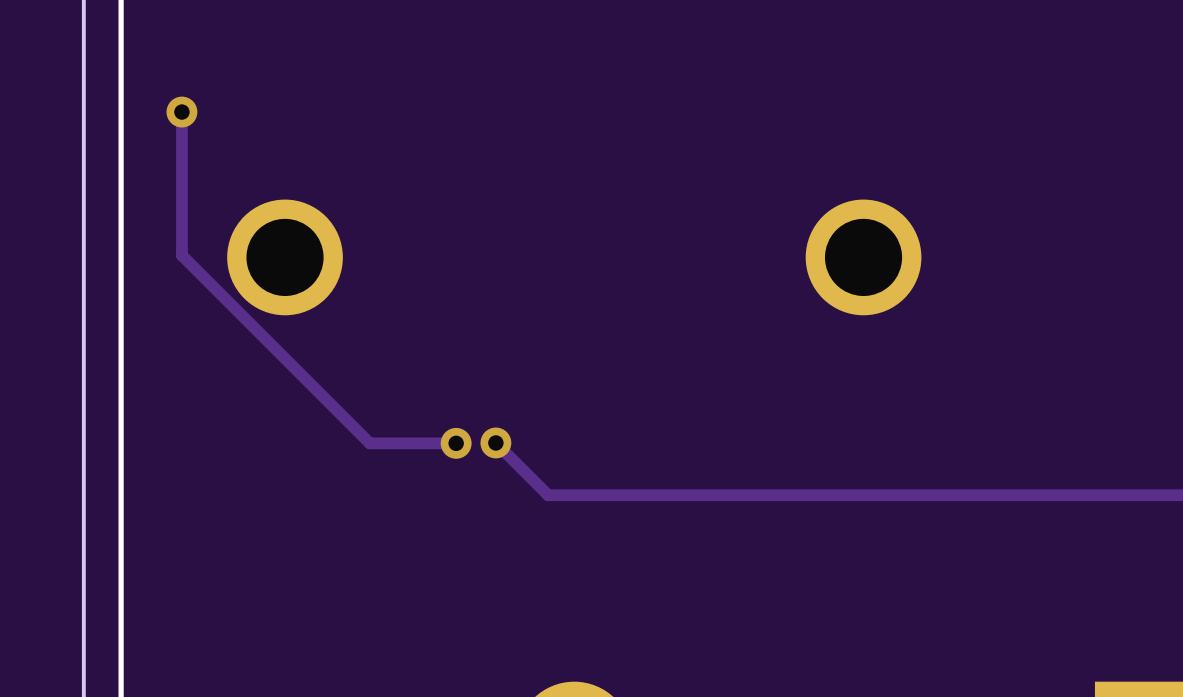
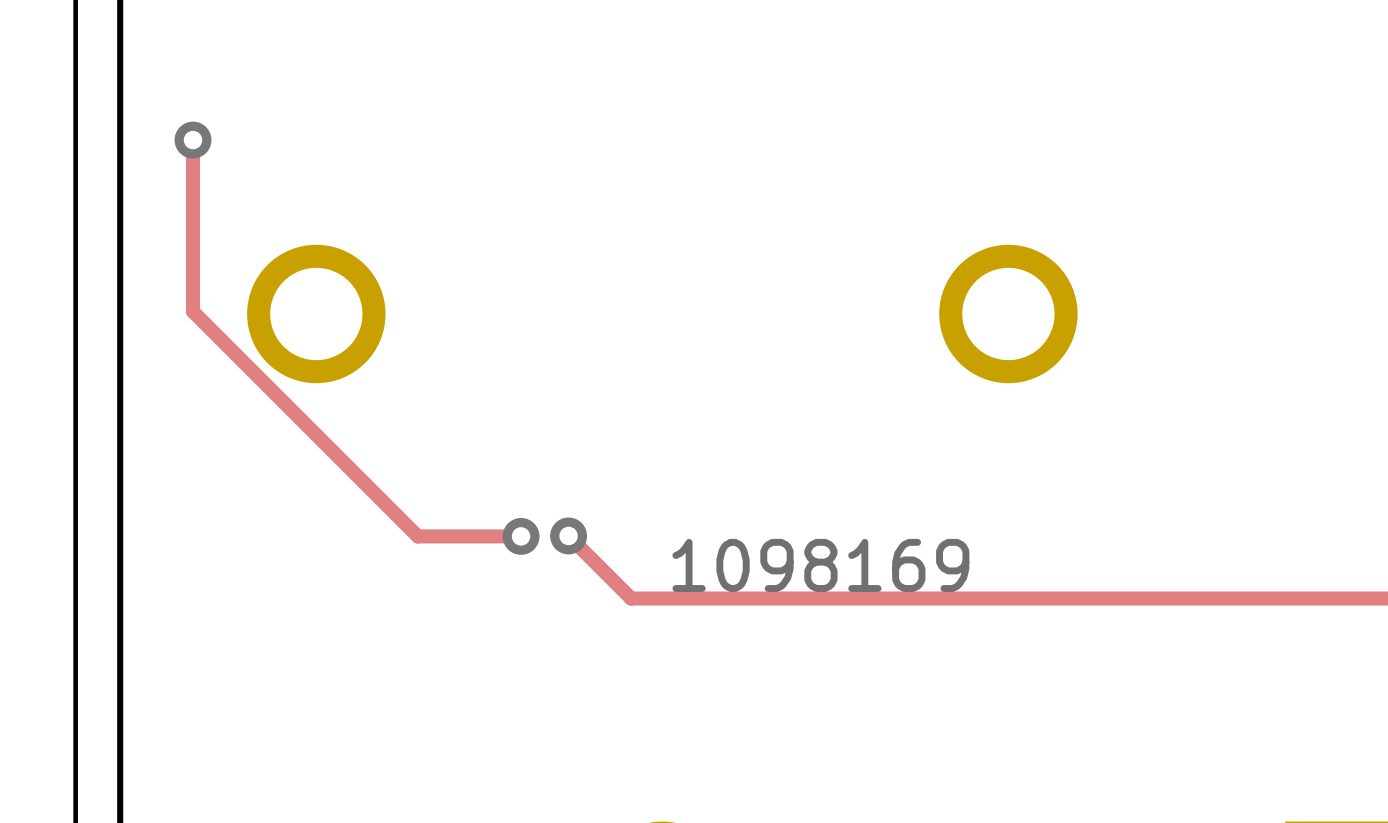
part value: none -> 1098169 (820, 565)

